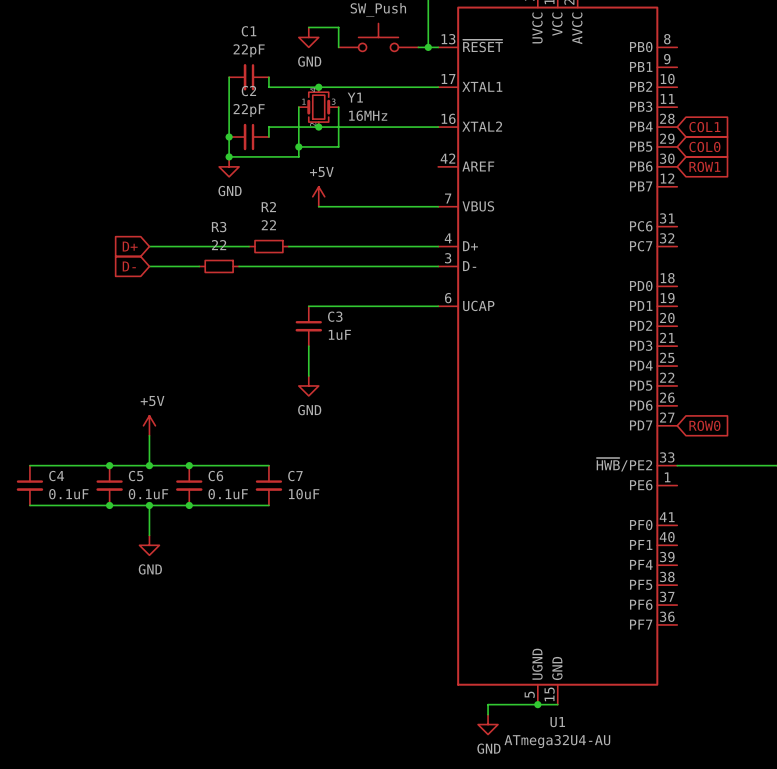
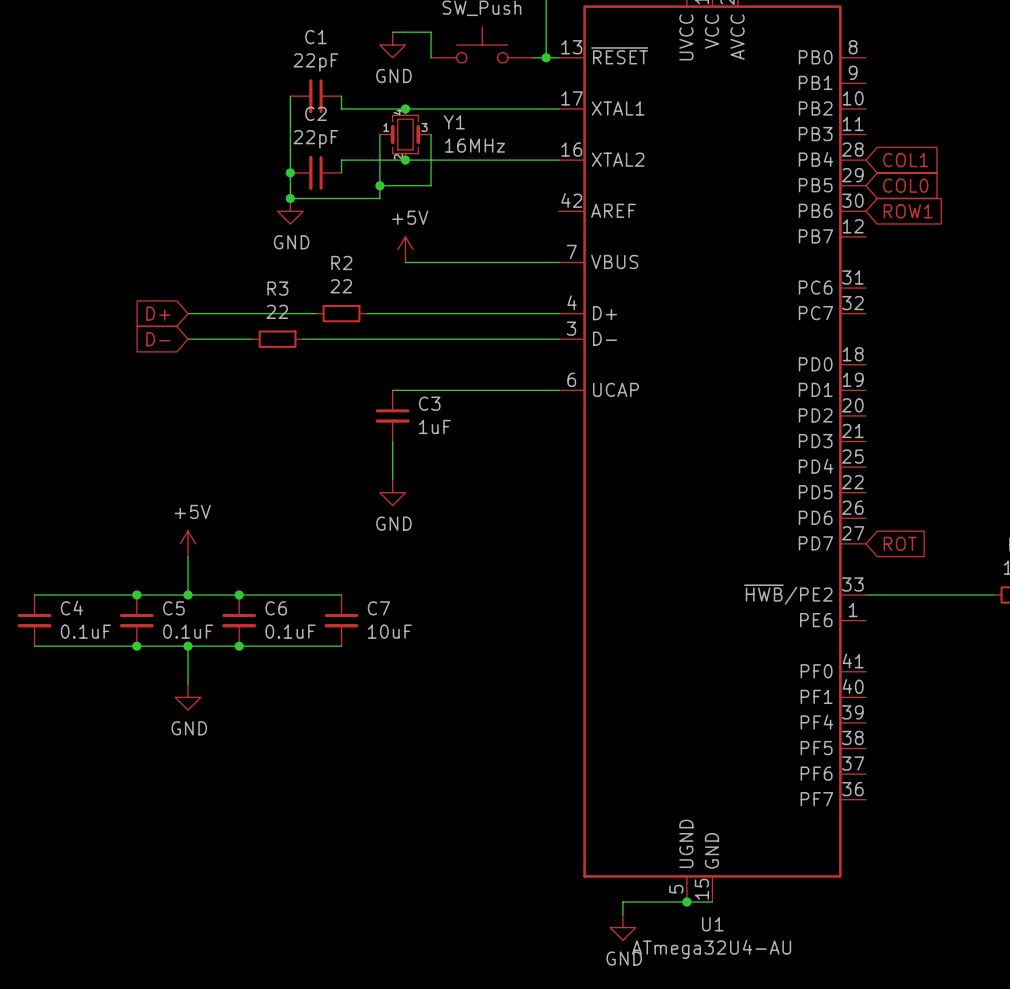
global label: ROW0 (704, 425) -> ROT (900, 543)

